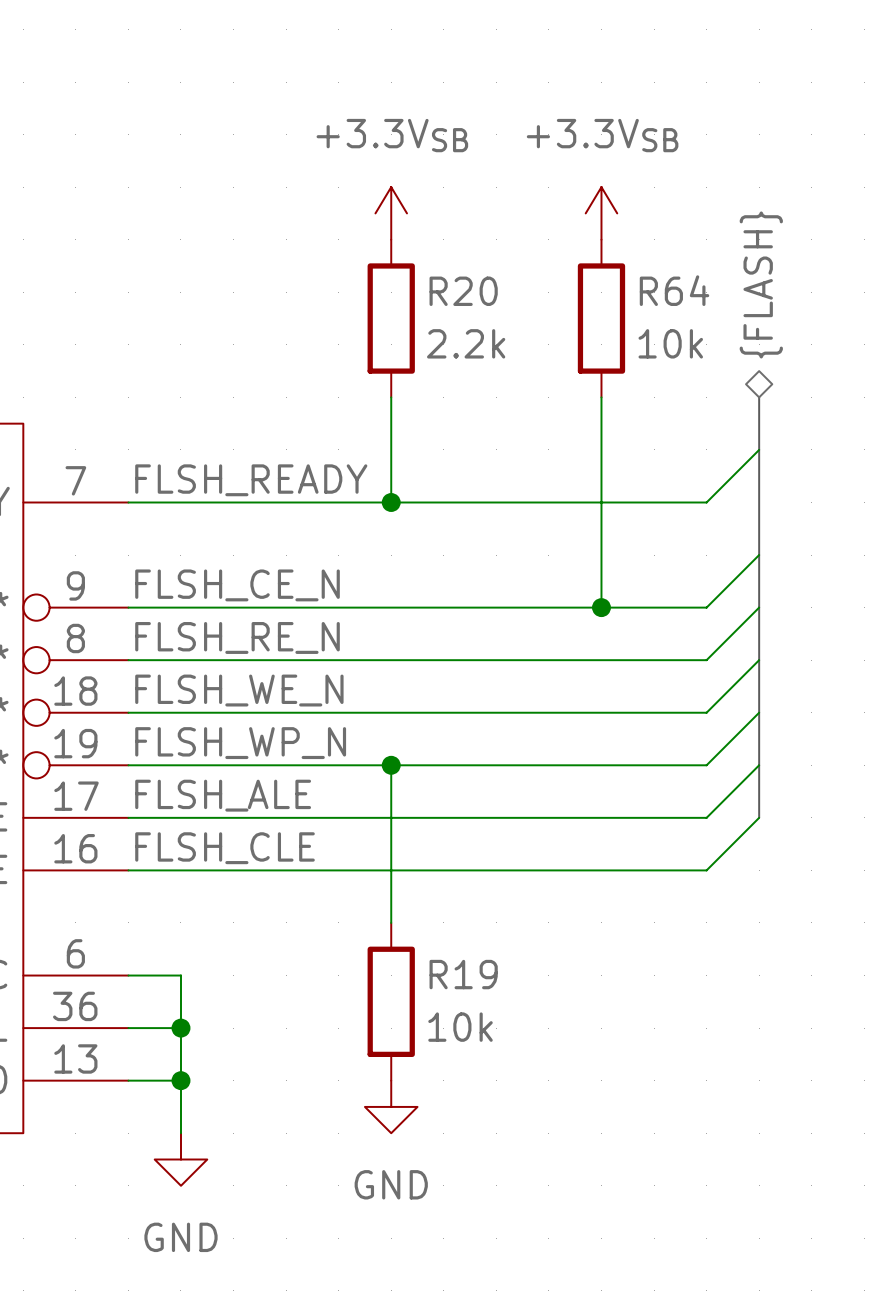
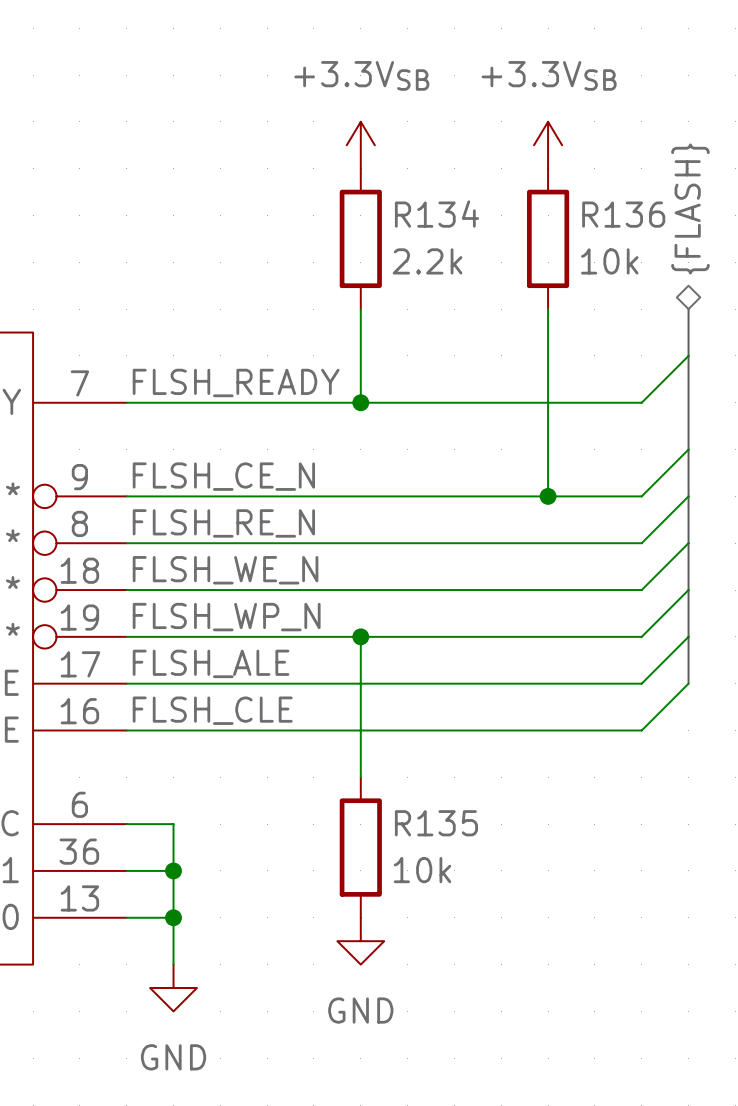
R64 name: R64 (674, 290) -> R136 (623, 214)
R20 name: R20 (463, 291) -> R134 (437, 214)
R19 name: R19 (463, 974) -> R135 (436, 823)

